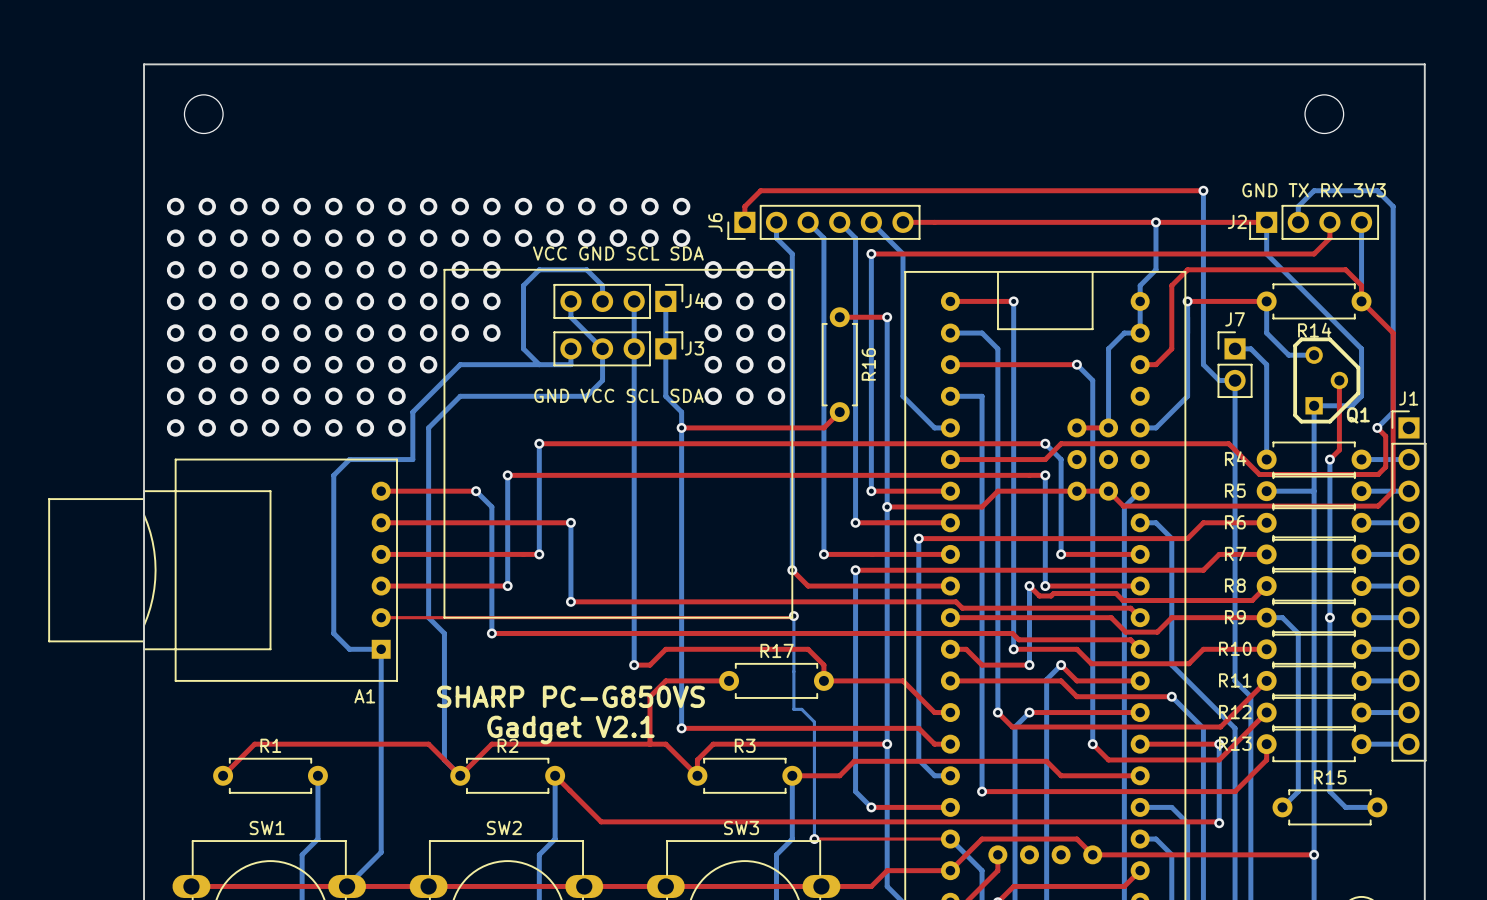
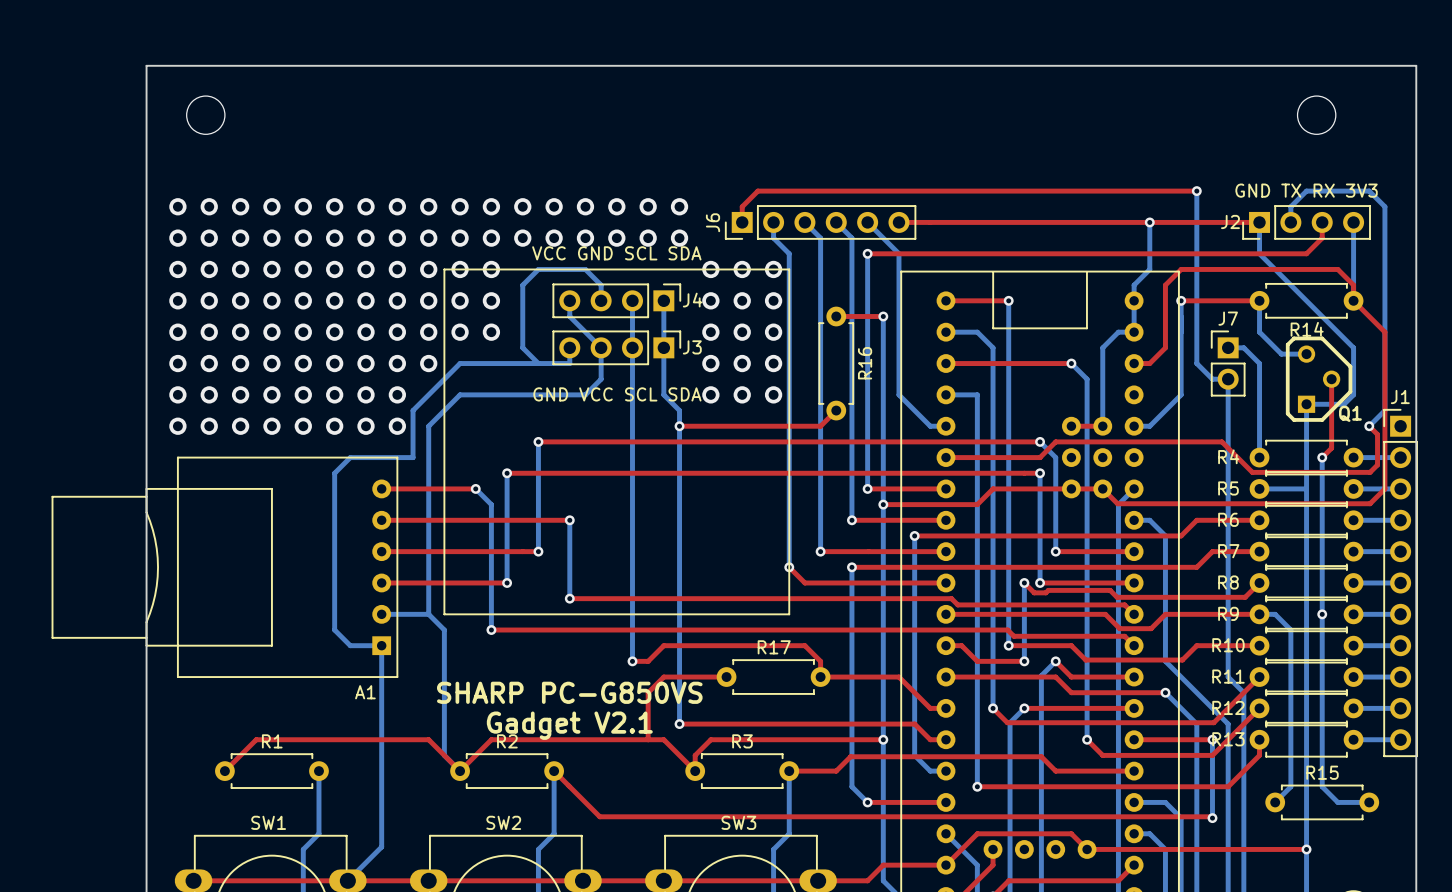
bottom track: (793, 616) (793, 709) (801, 709) (814, 722) (814, 839) -> none
top track: (793, 616) (792, 617) (381, 617) -> none
via: (793, 616) -> none
bottom track: none -> (381, 614) (428, 614)
top track: (814, 839) (950, 839) -> none
via: (814, 839) -> none

